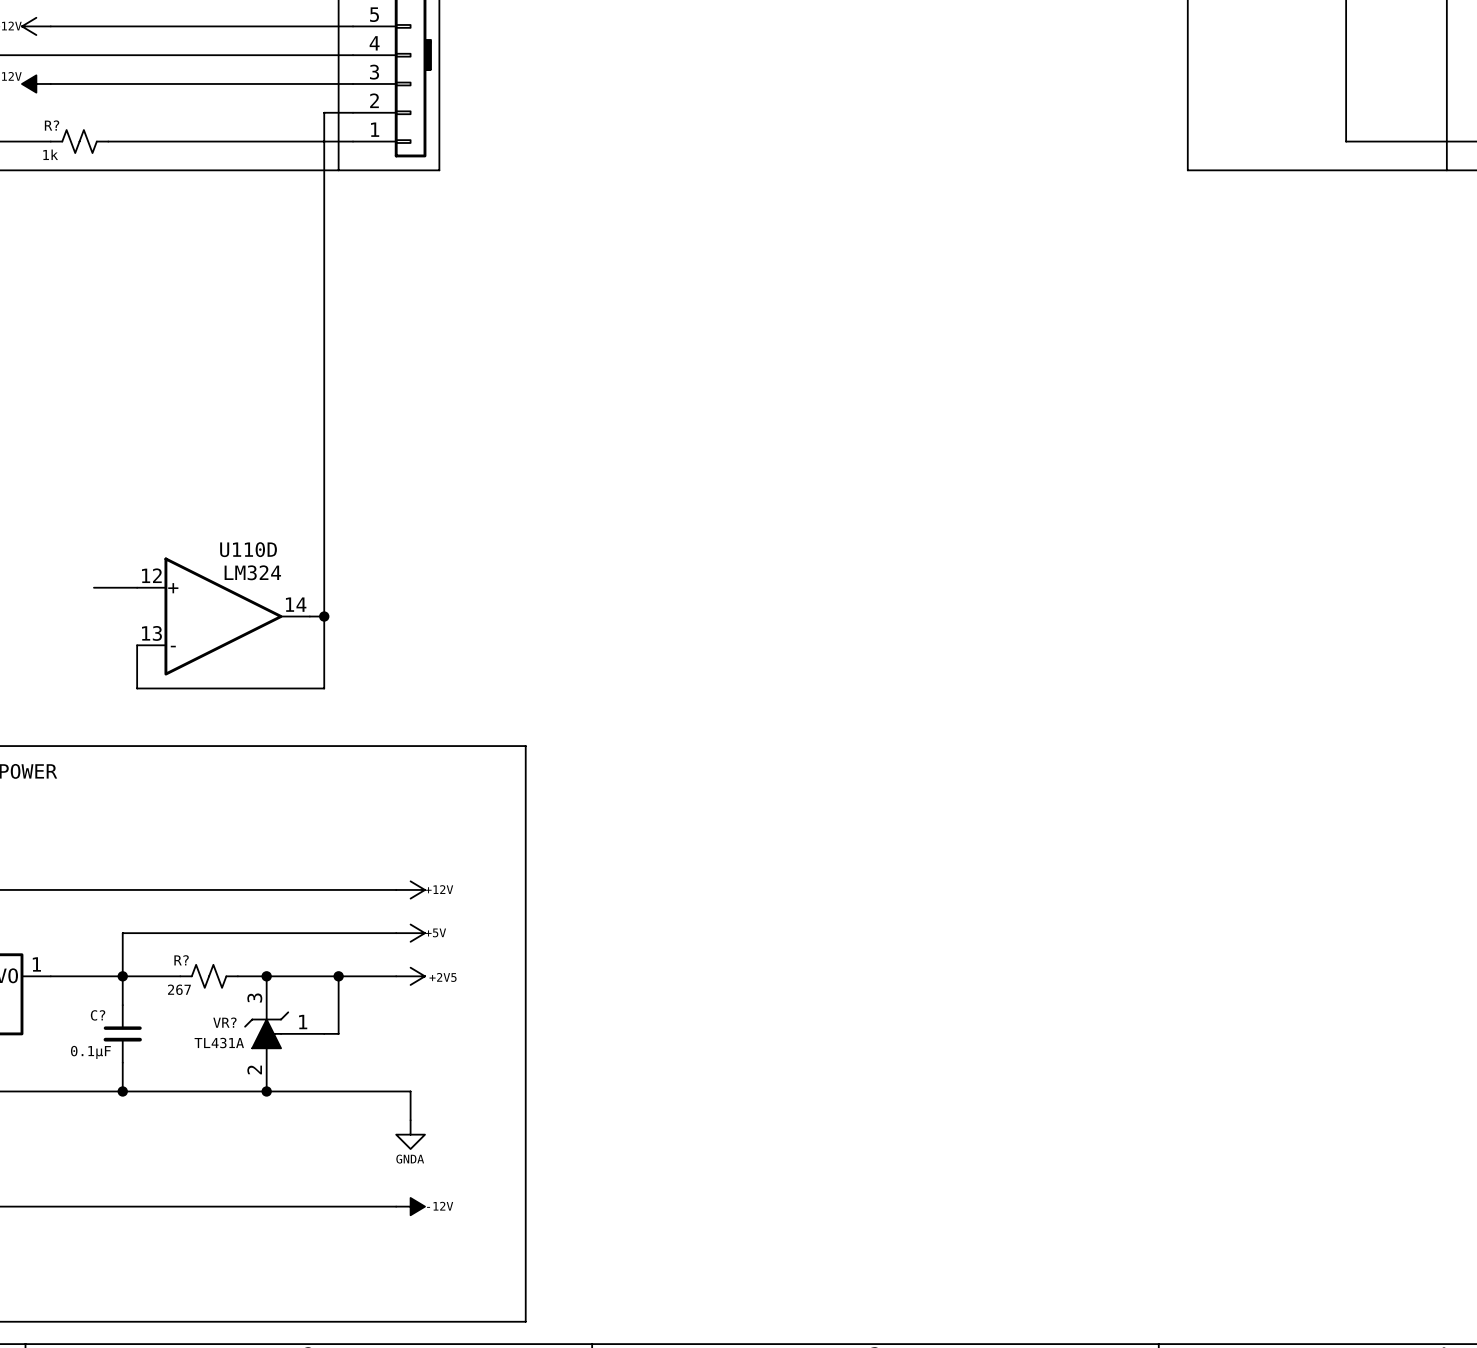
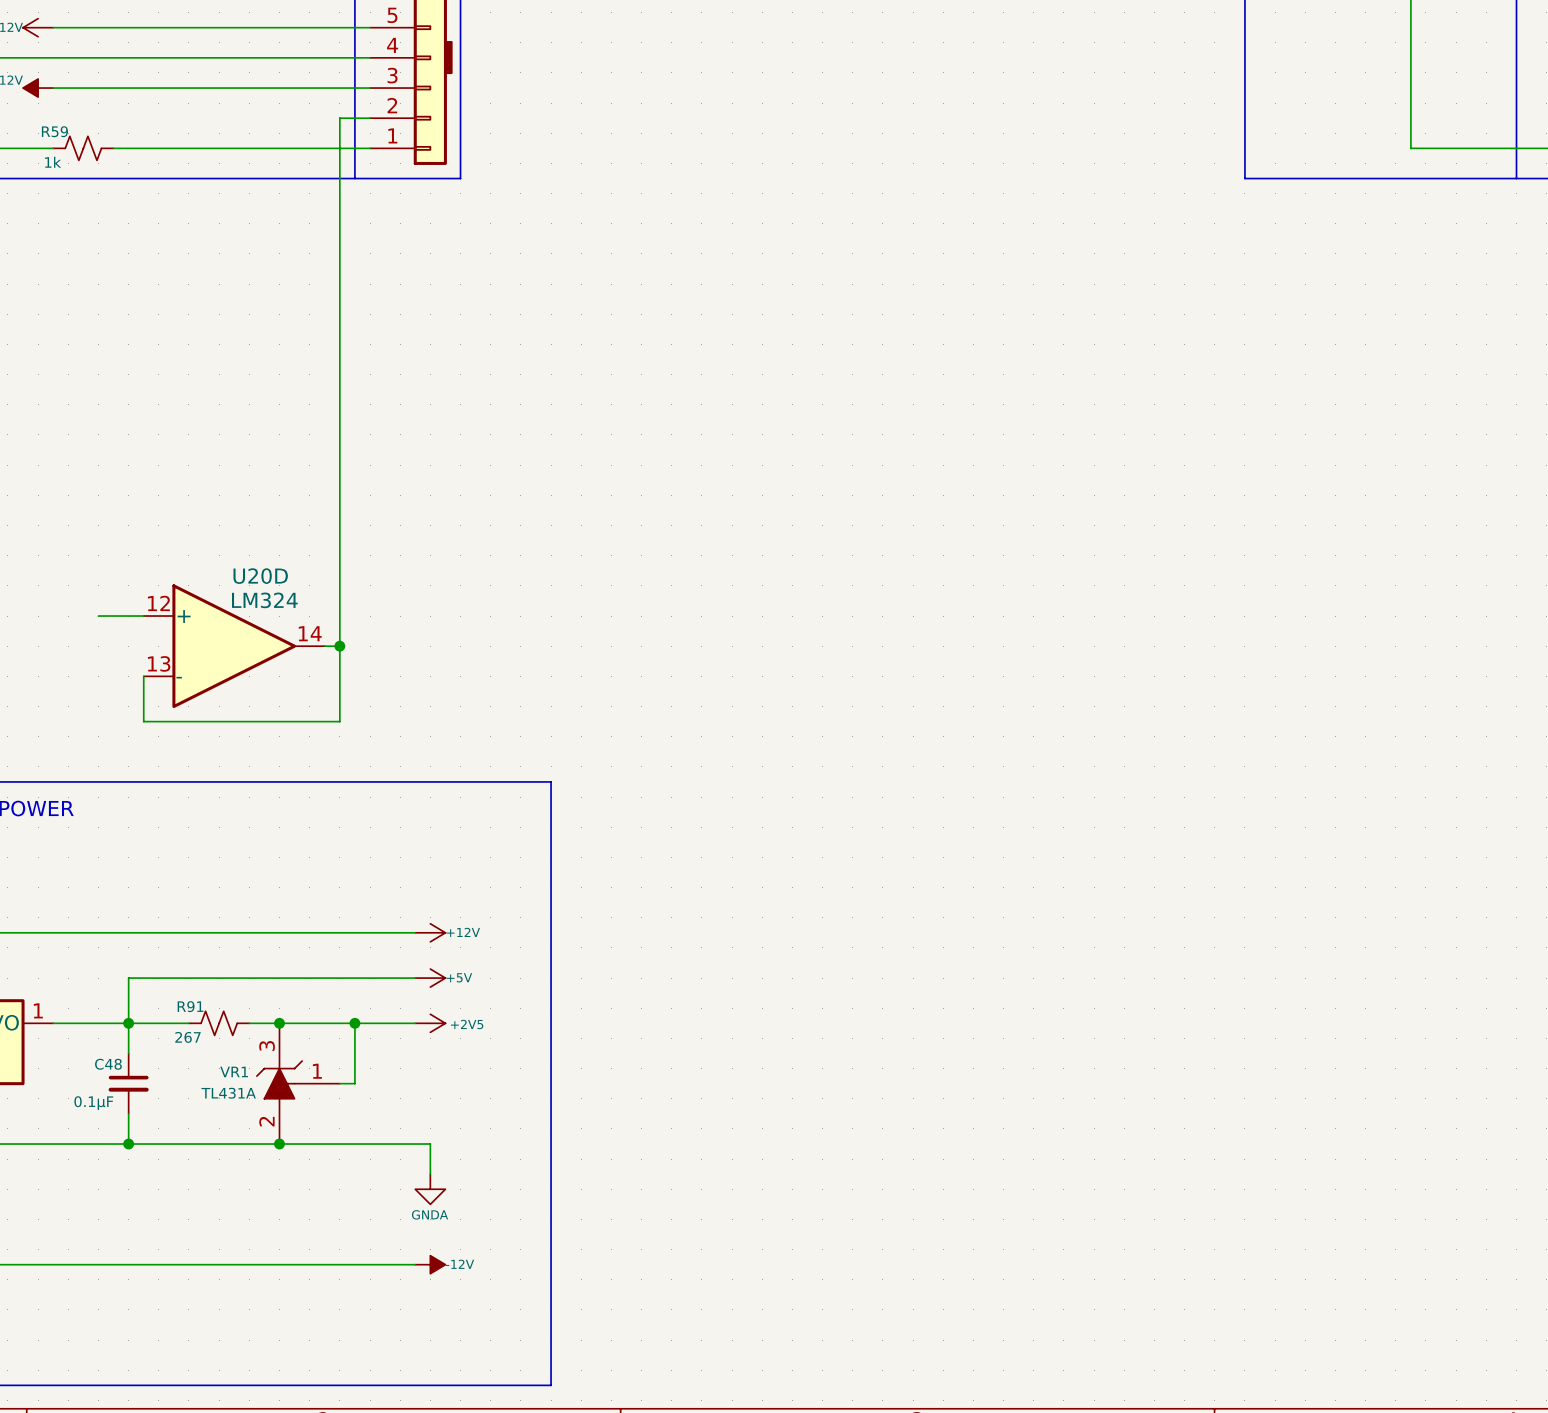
R? name: R? (52, 125) -> R59 (54, 131)
U110D name: U110D (248, 549) -> U20D (260, 576)
R? name: R? (181, 960) -> R91 (190, 1006)
C? name: C? (98, 1015) -> C48 (108, 1064)
VR? name: VR? (224, 1022) -> VR1 (234, 1071)

